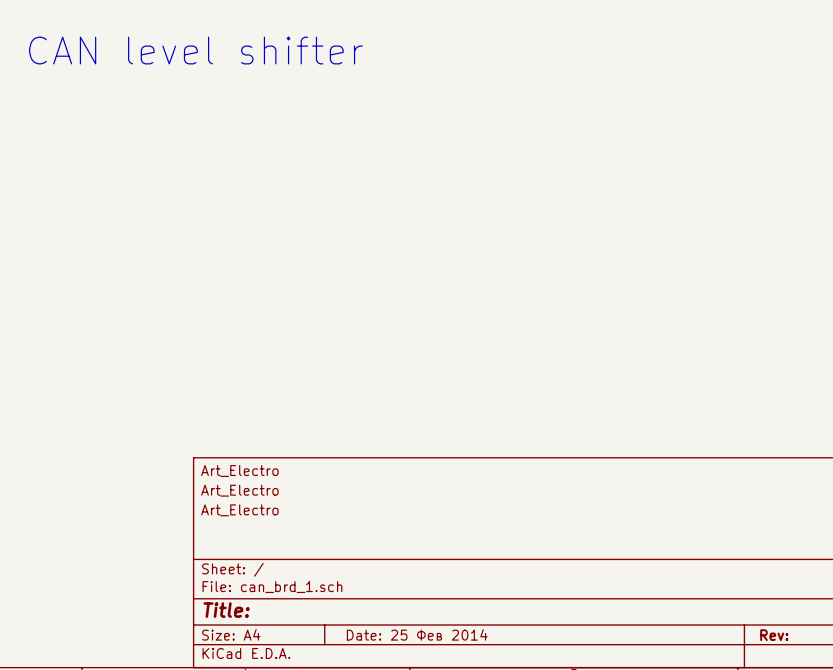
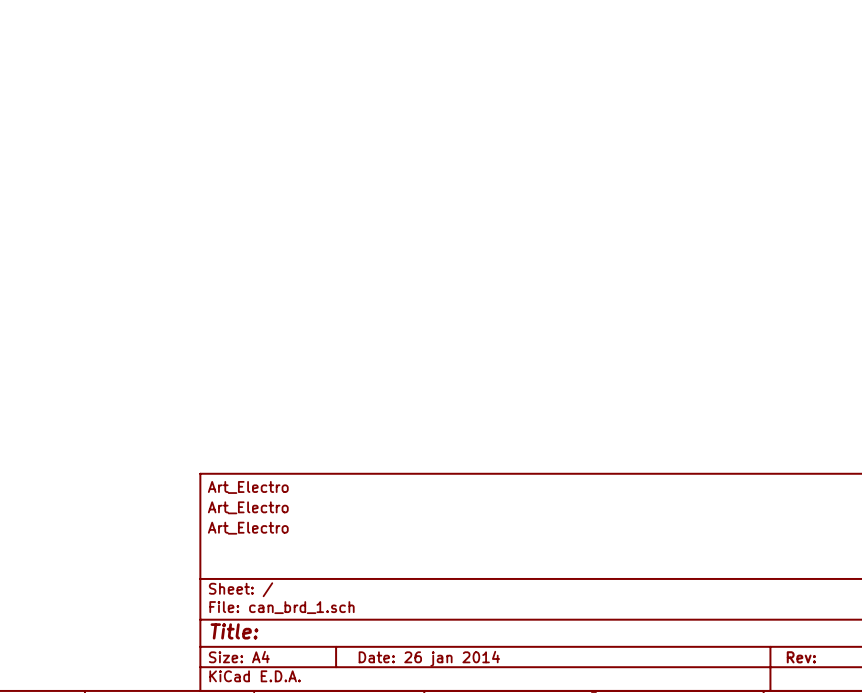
text: CAN level shifter (195, 50) -> none
title block: Date: 25 Фев 2014 (417, 634) -> Date: 26 jan 2014 (429, 658)

